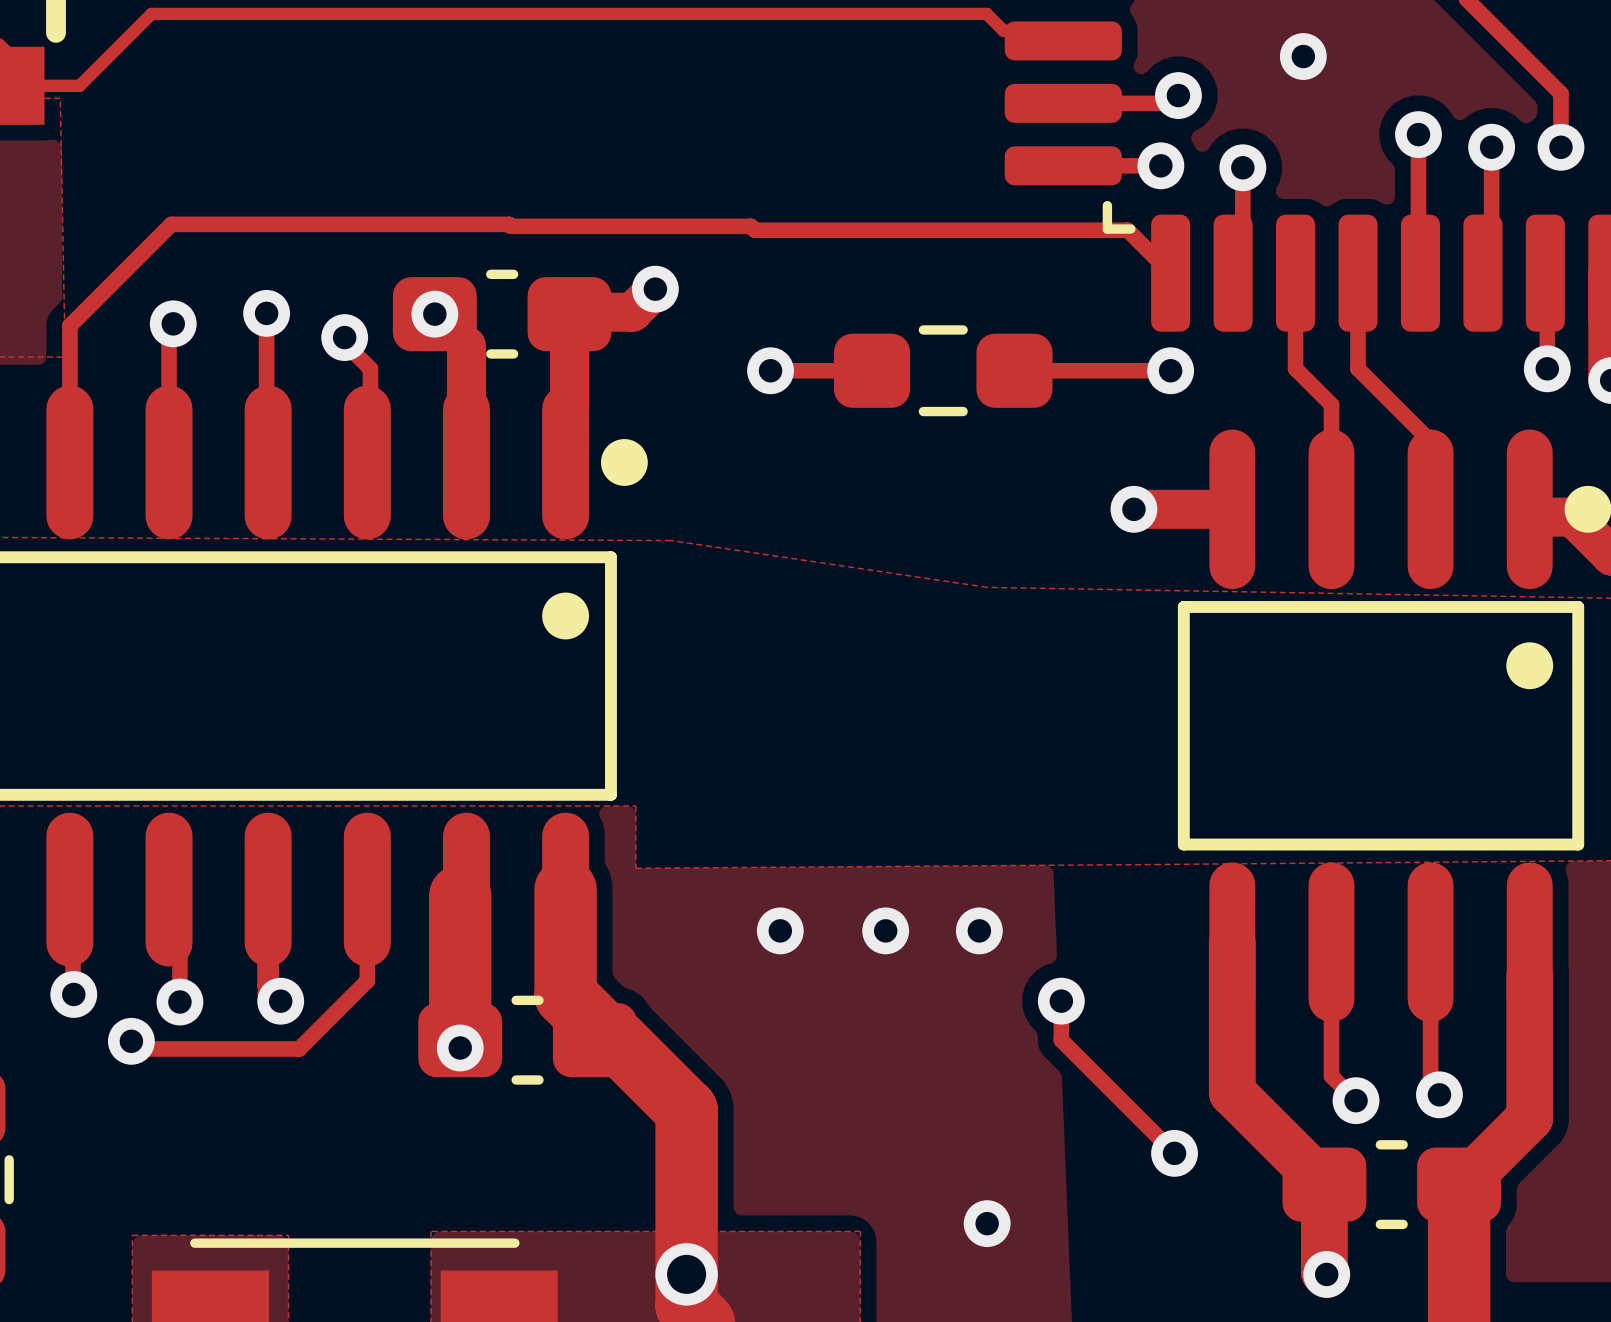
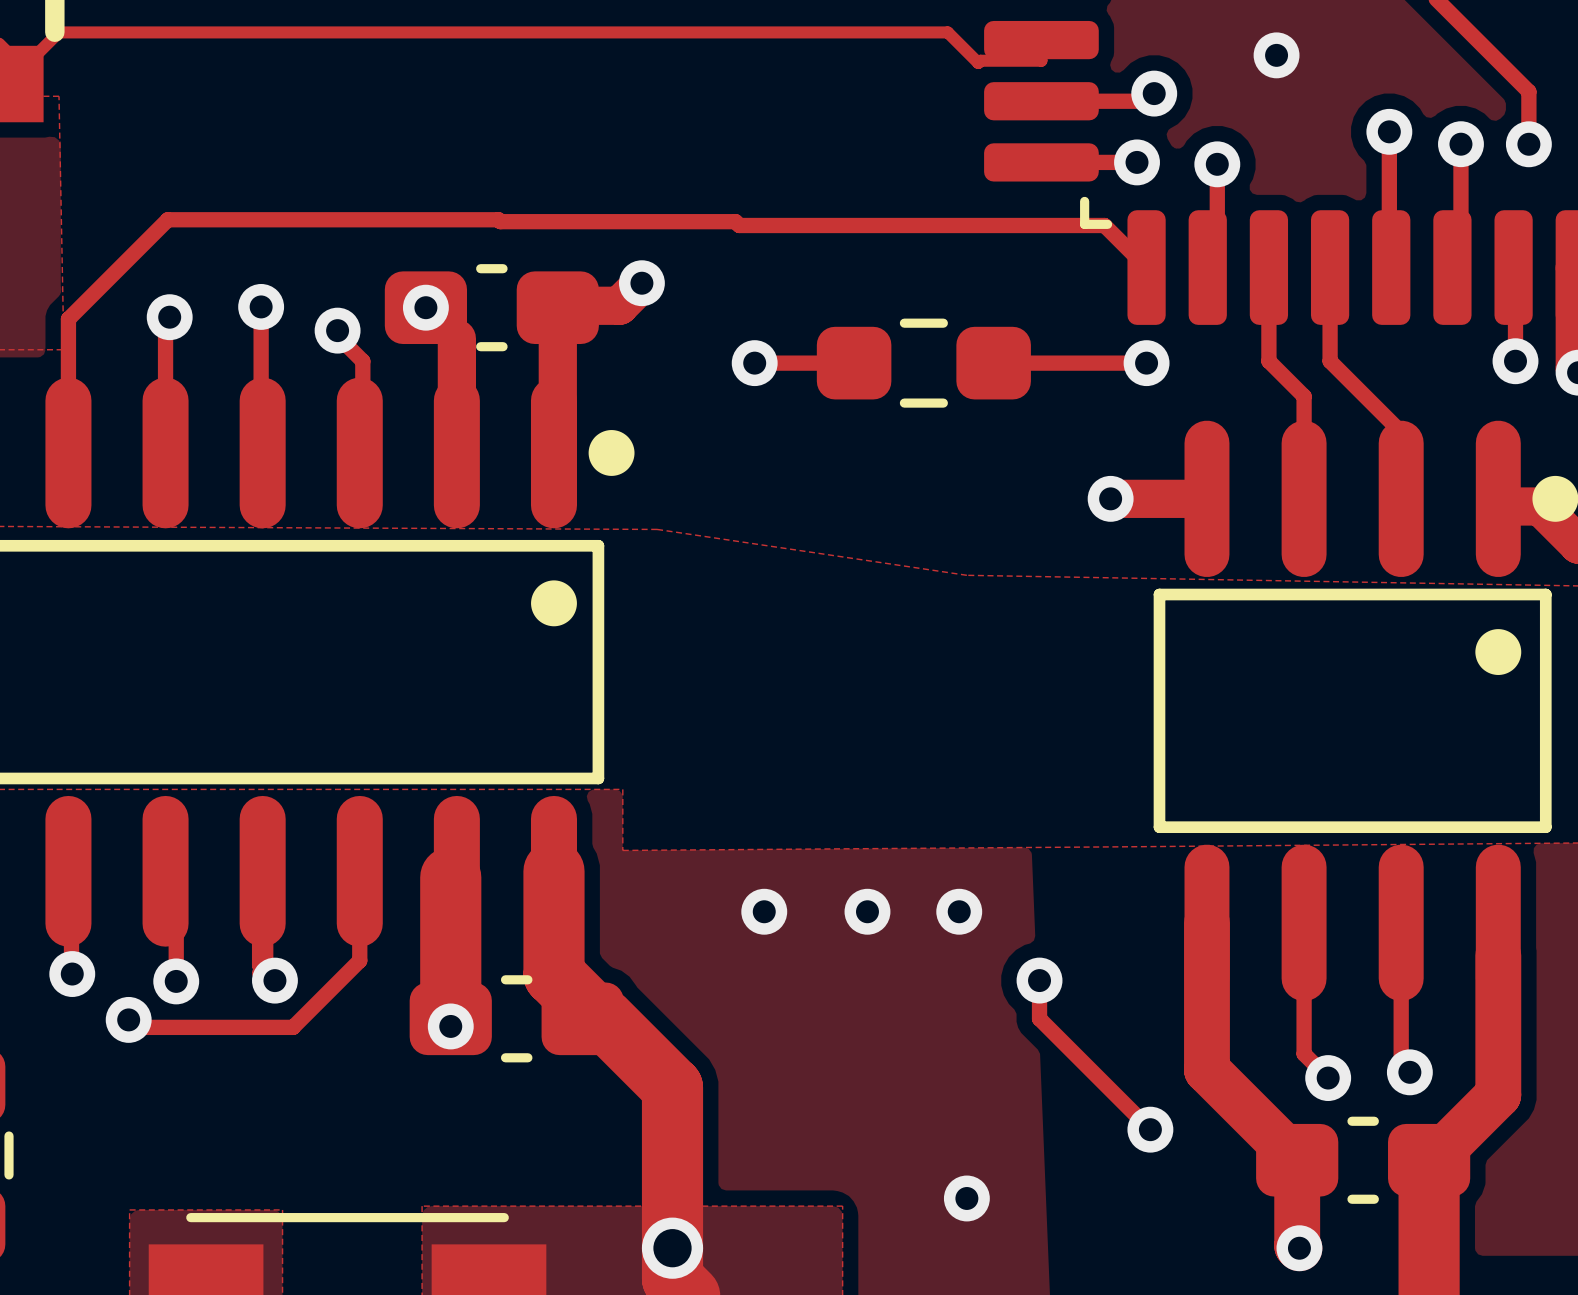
track: (1063, 40) (1053, 30) (1003, 30) (986, 13) (151, 13) (79, 85) (21, 85) -> (1041, 40) (1041, 60) (980, 60) (978, 62) (947, 32) (58, 32) (20, 70)

